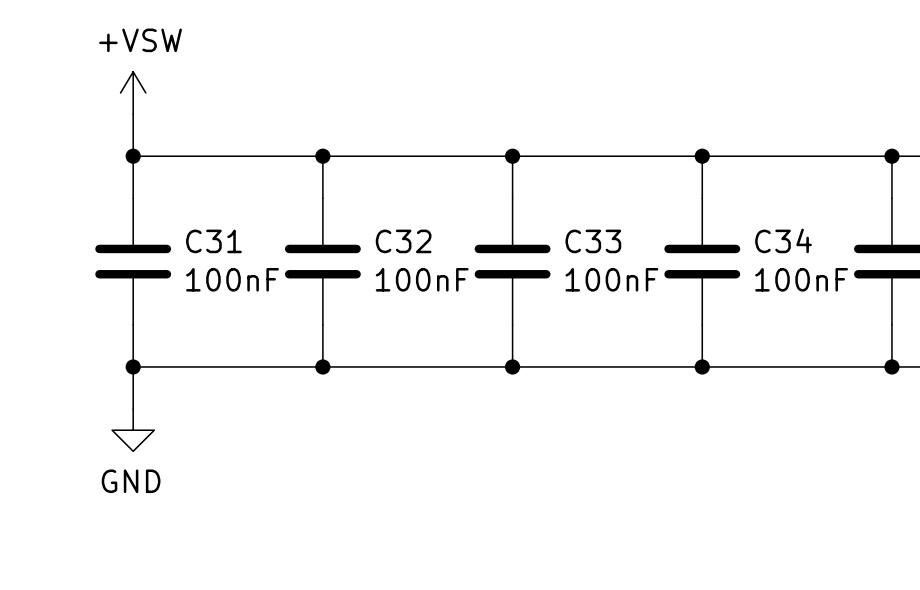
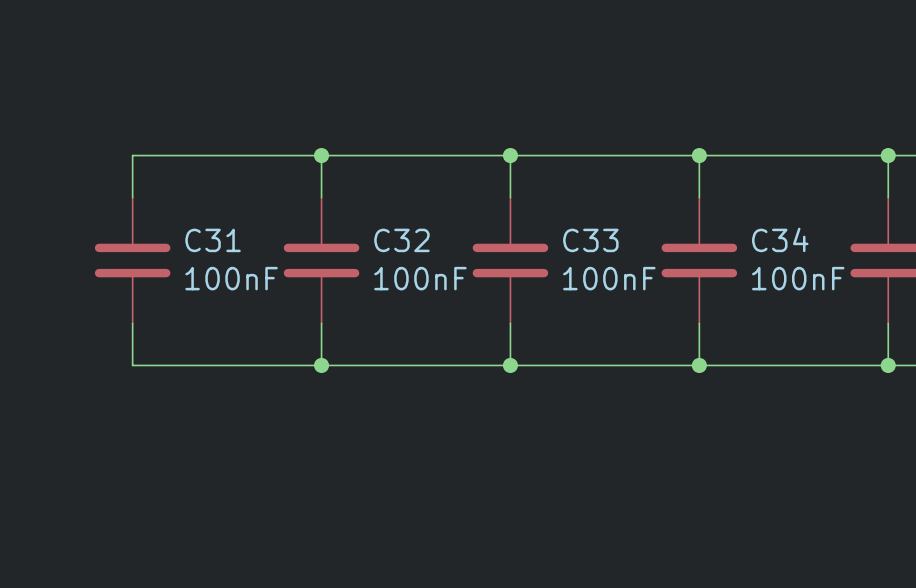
power symbol: +VSW (133, 92) -> none
wire: (133, 114) (133, 156) -> none
junction: (133, 156) -> none
wire: (133, 366) (133, 409) -> none
junction: (133, 366) -> none
power symbol: GND (133, 430) -> none

